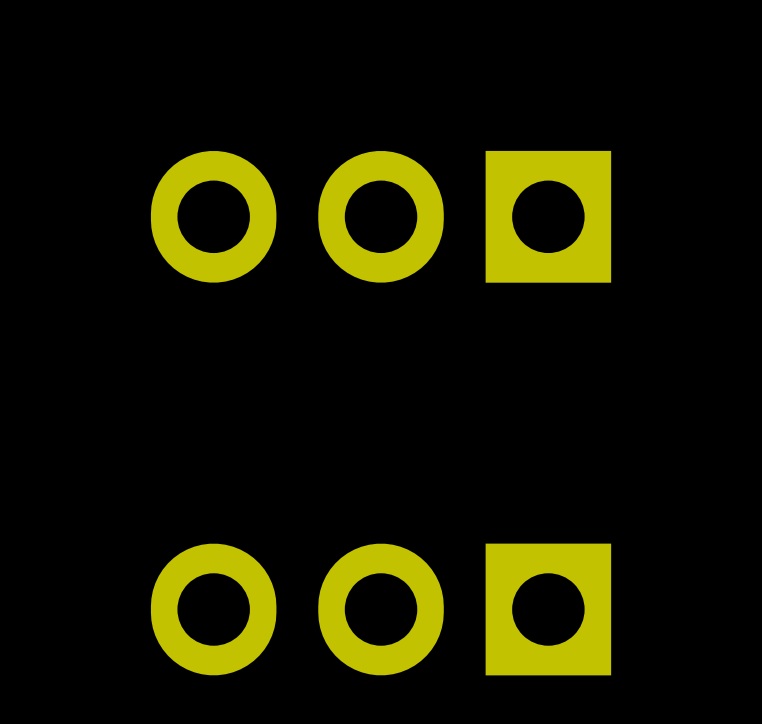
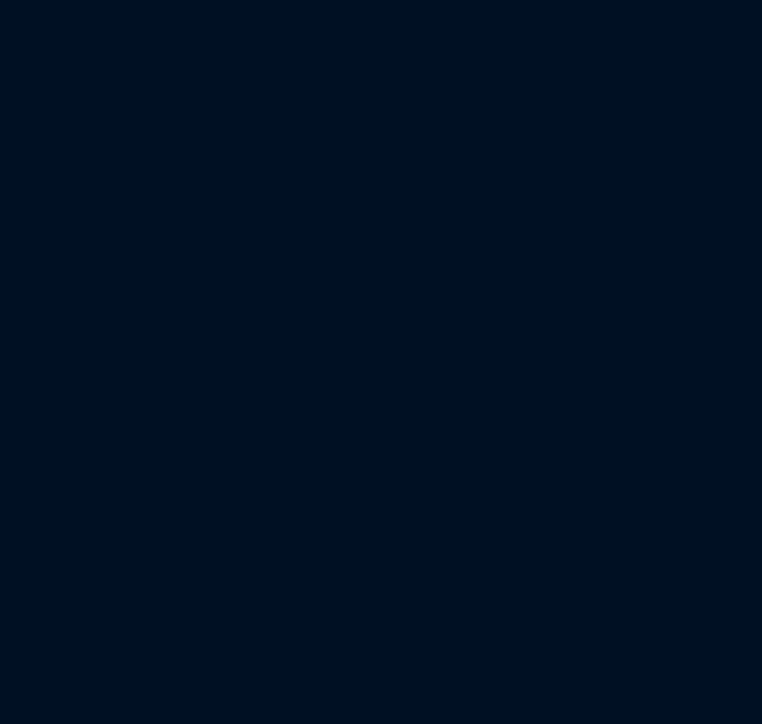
part: (381, 216) -> none
part: (381, 609) -> none

